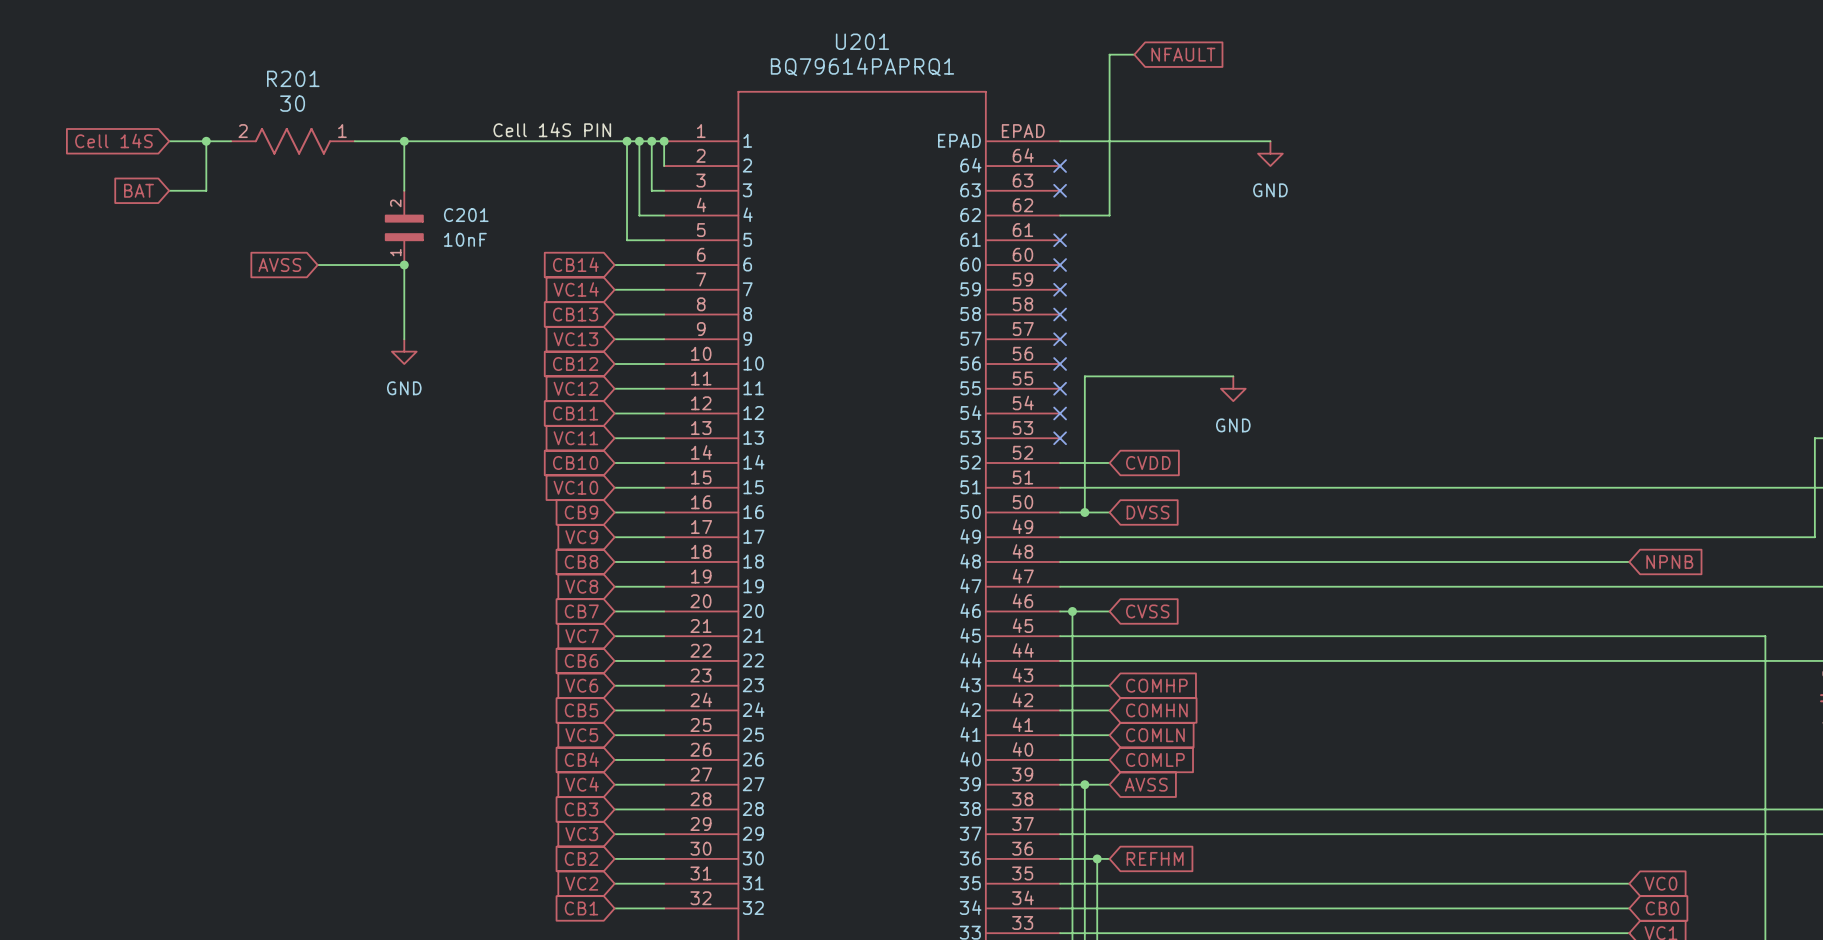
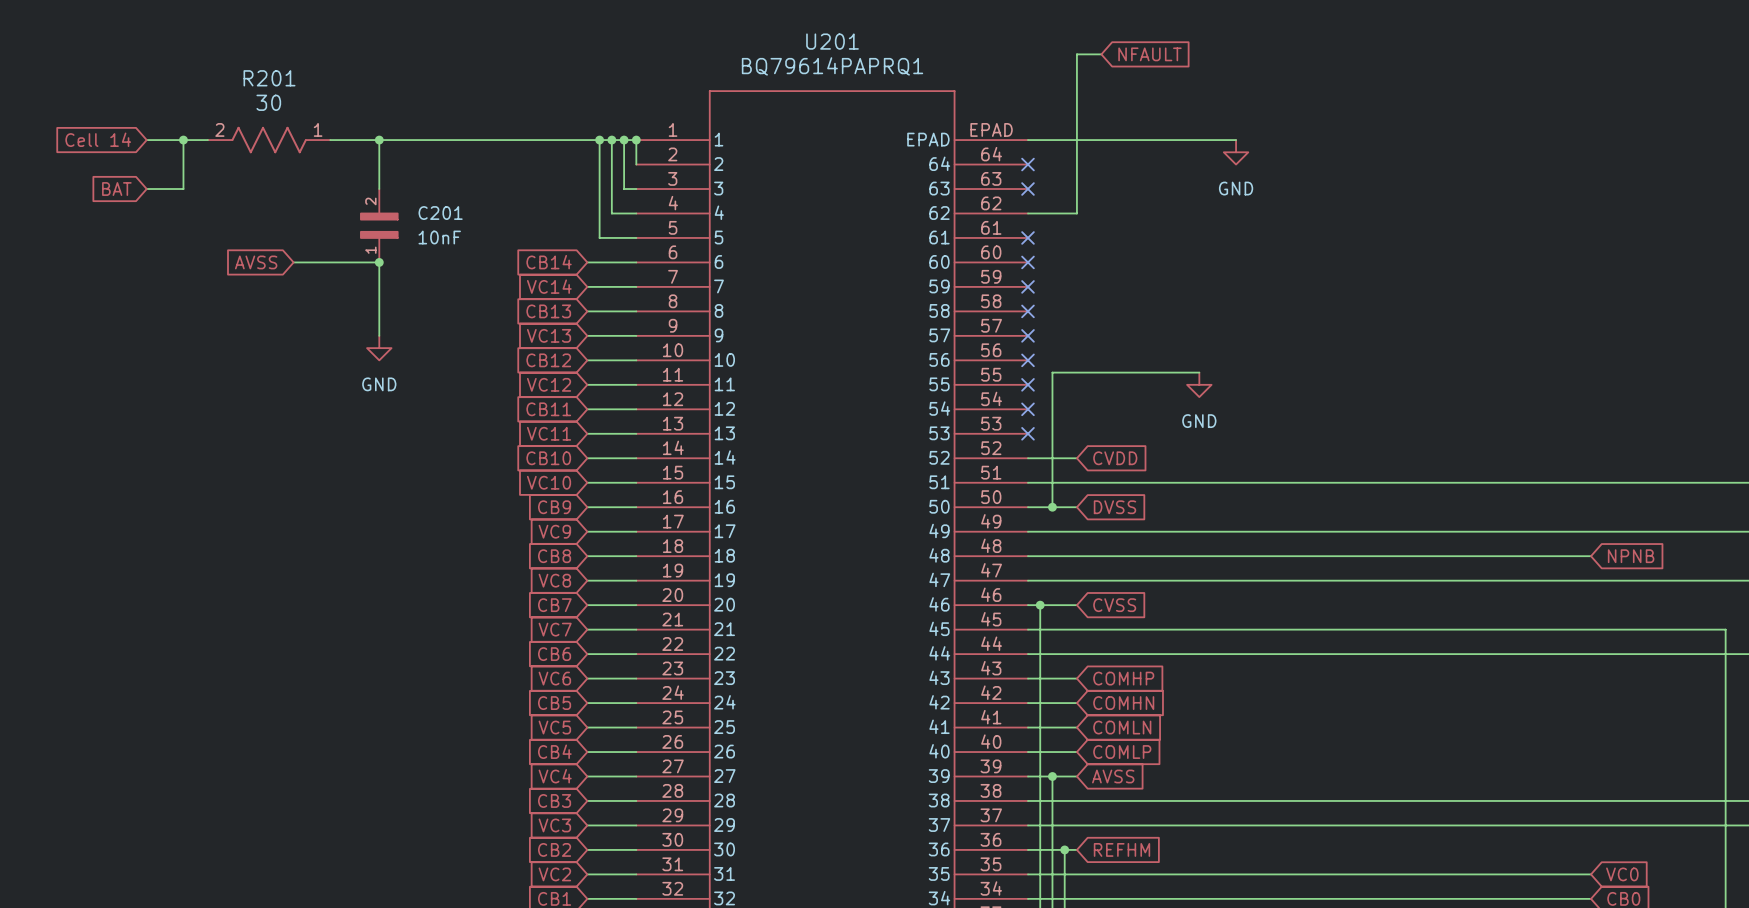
label: Cell 14S PIN (552, 129) -> none
global label: Cell 14S (113, 140) -> Cell 14 (98, 139)

